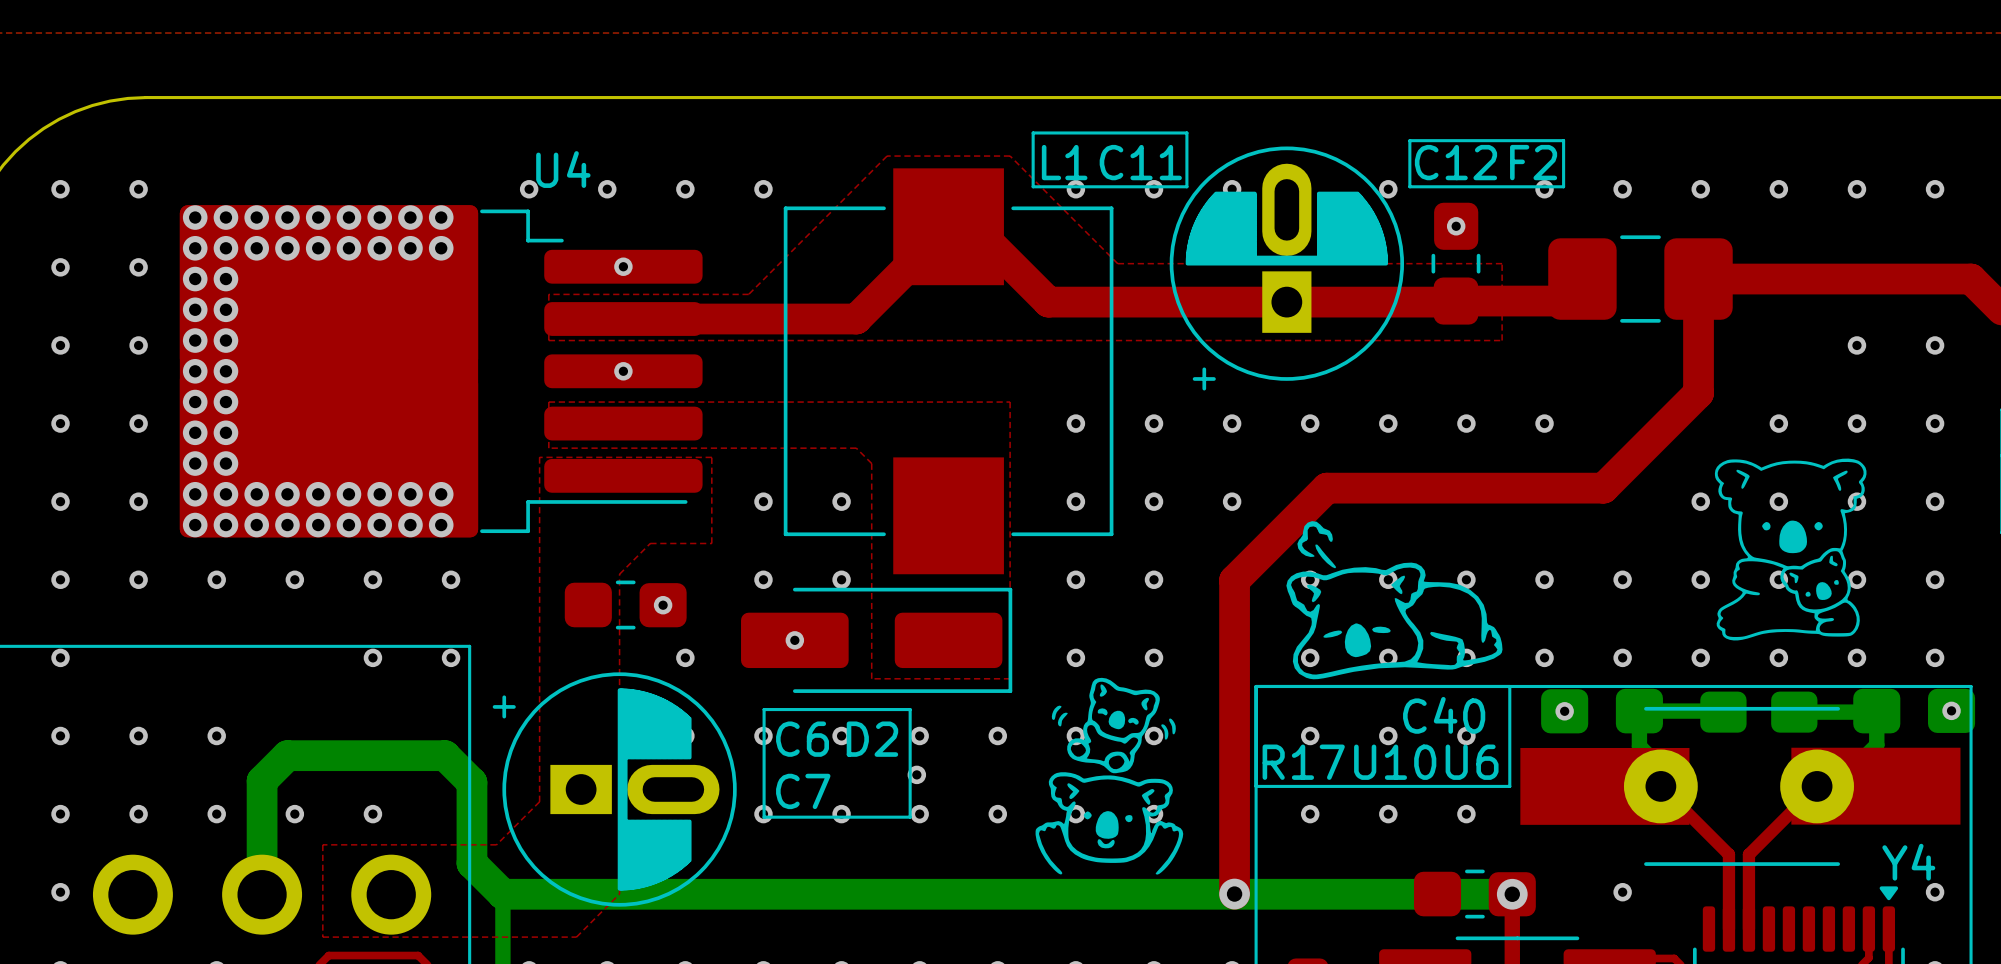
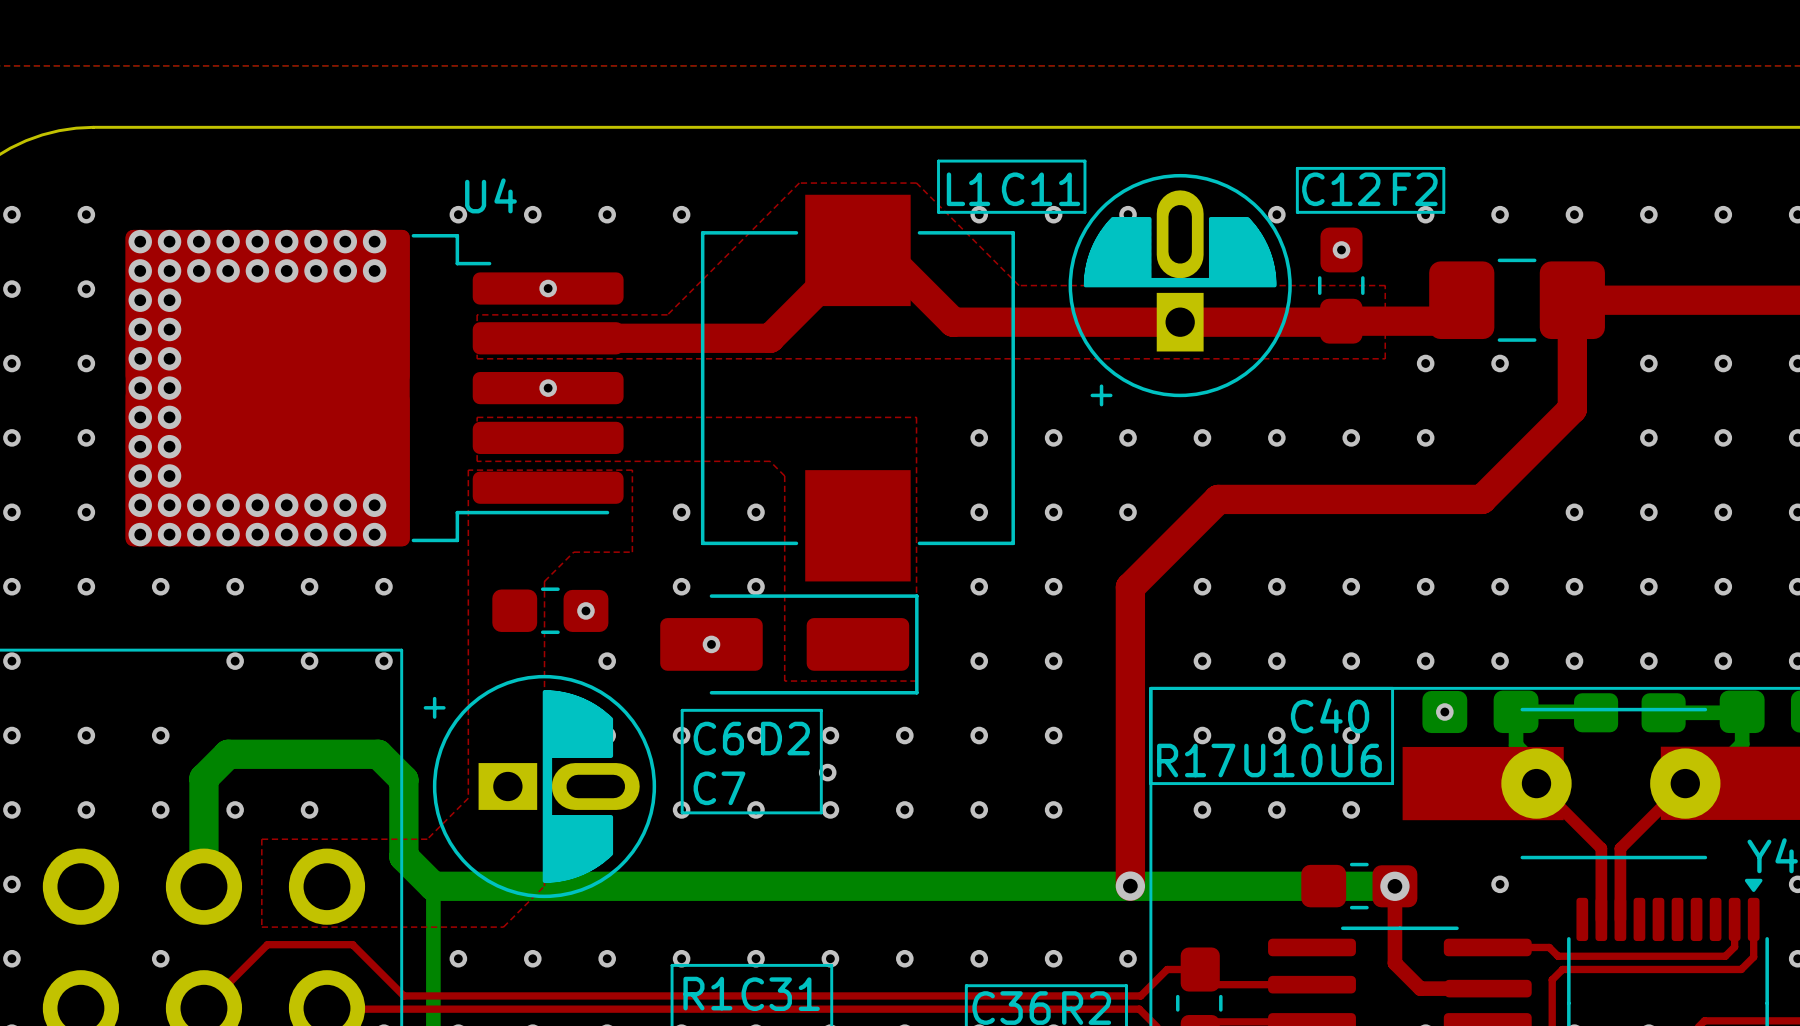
via: none -> (1425, 363)
via: none -> (1500, 363)
via: none -> (1648, 363)
drawing: [1714, 458, 1867, 641] -> none
drawing: [1286, 521, 1503, 680] -> none
via: none -> (235, 661)
drawing: [1035, 677, 1184, 875] -> none

